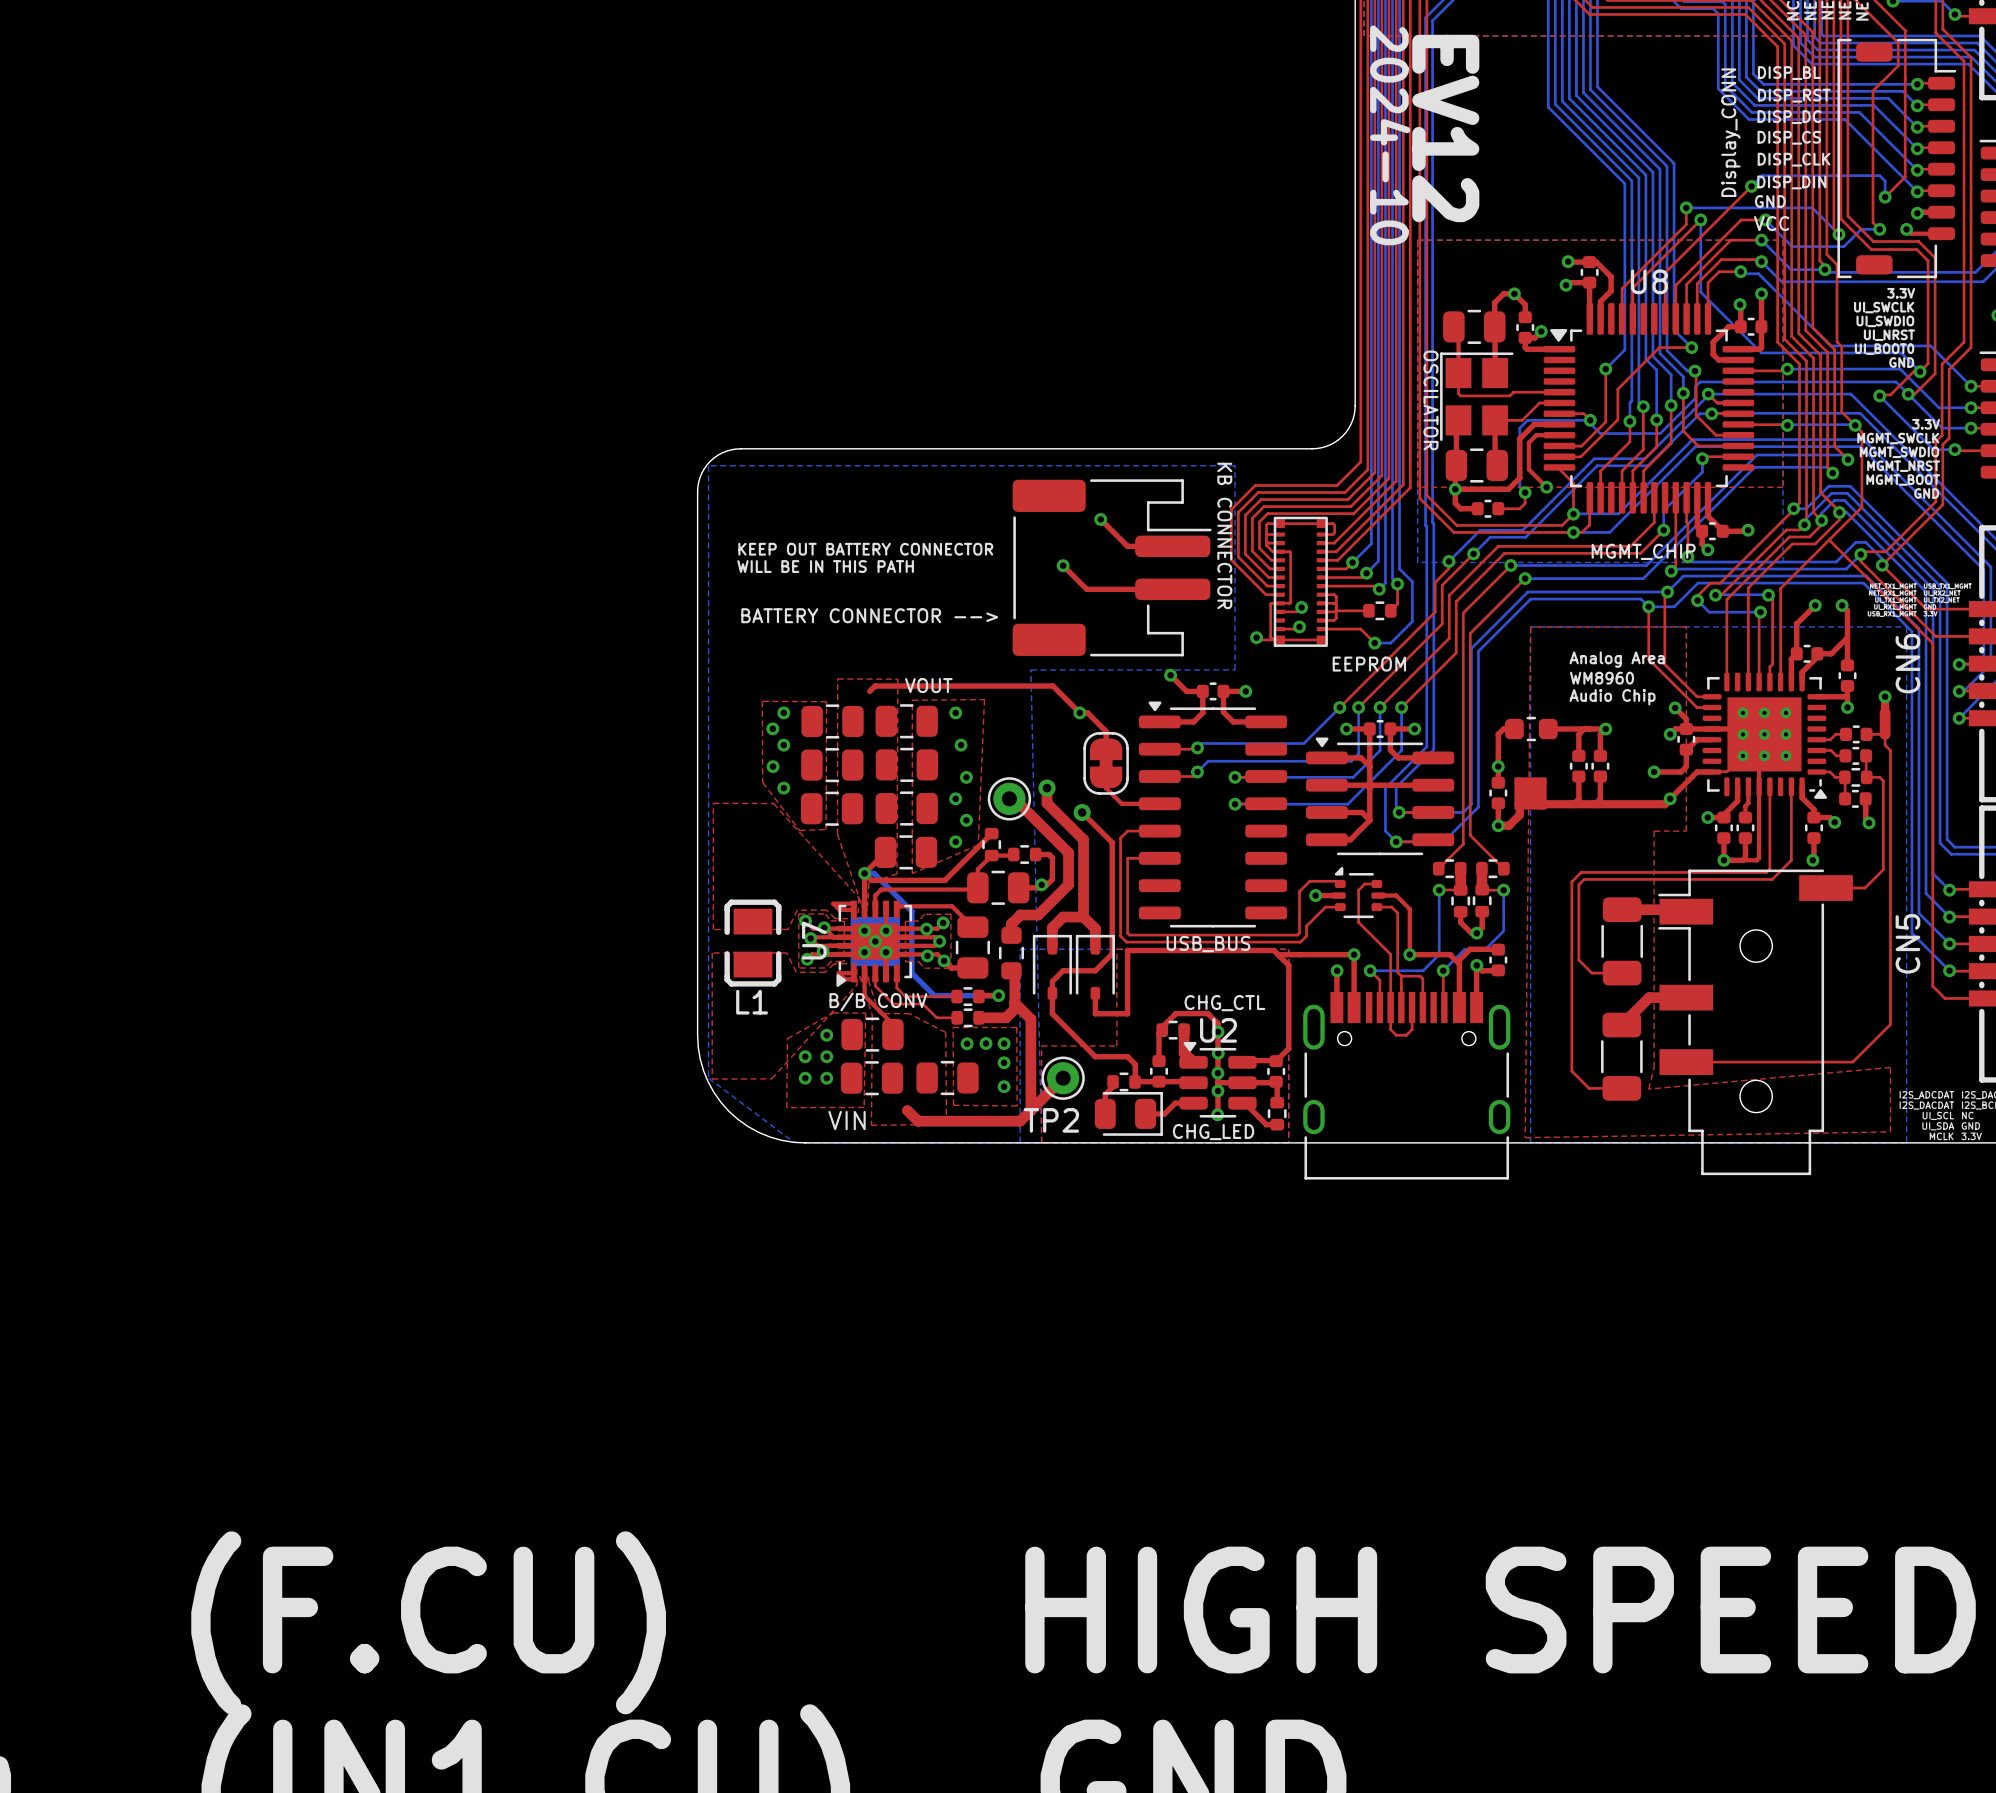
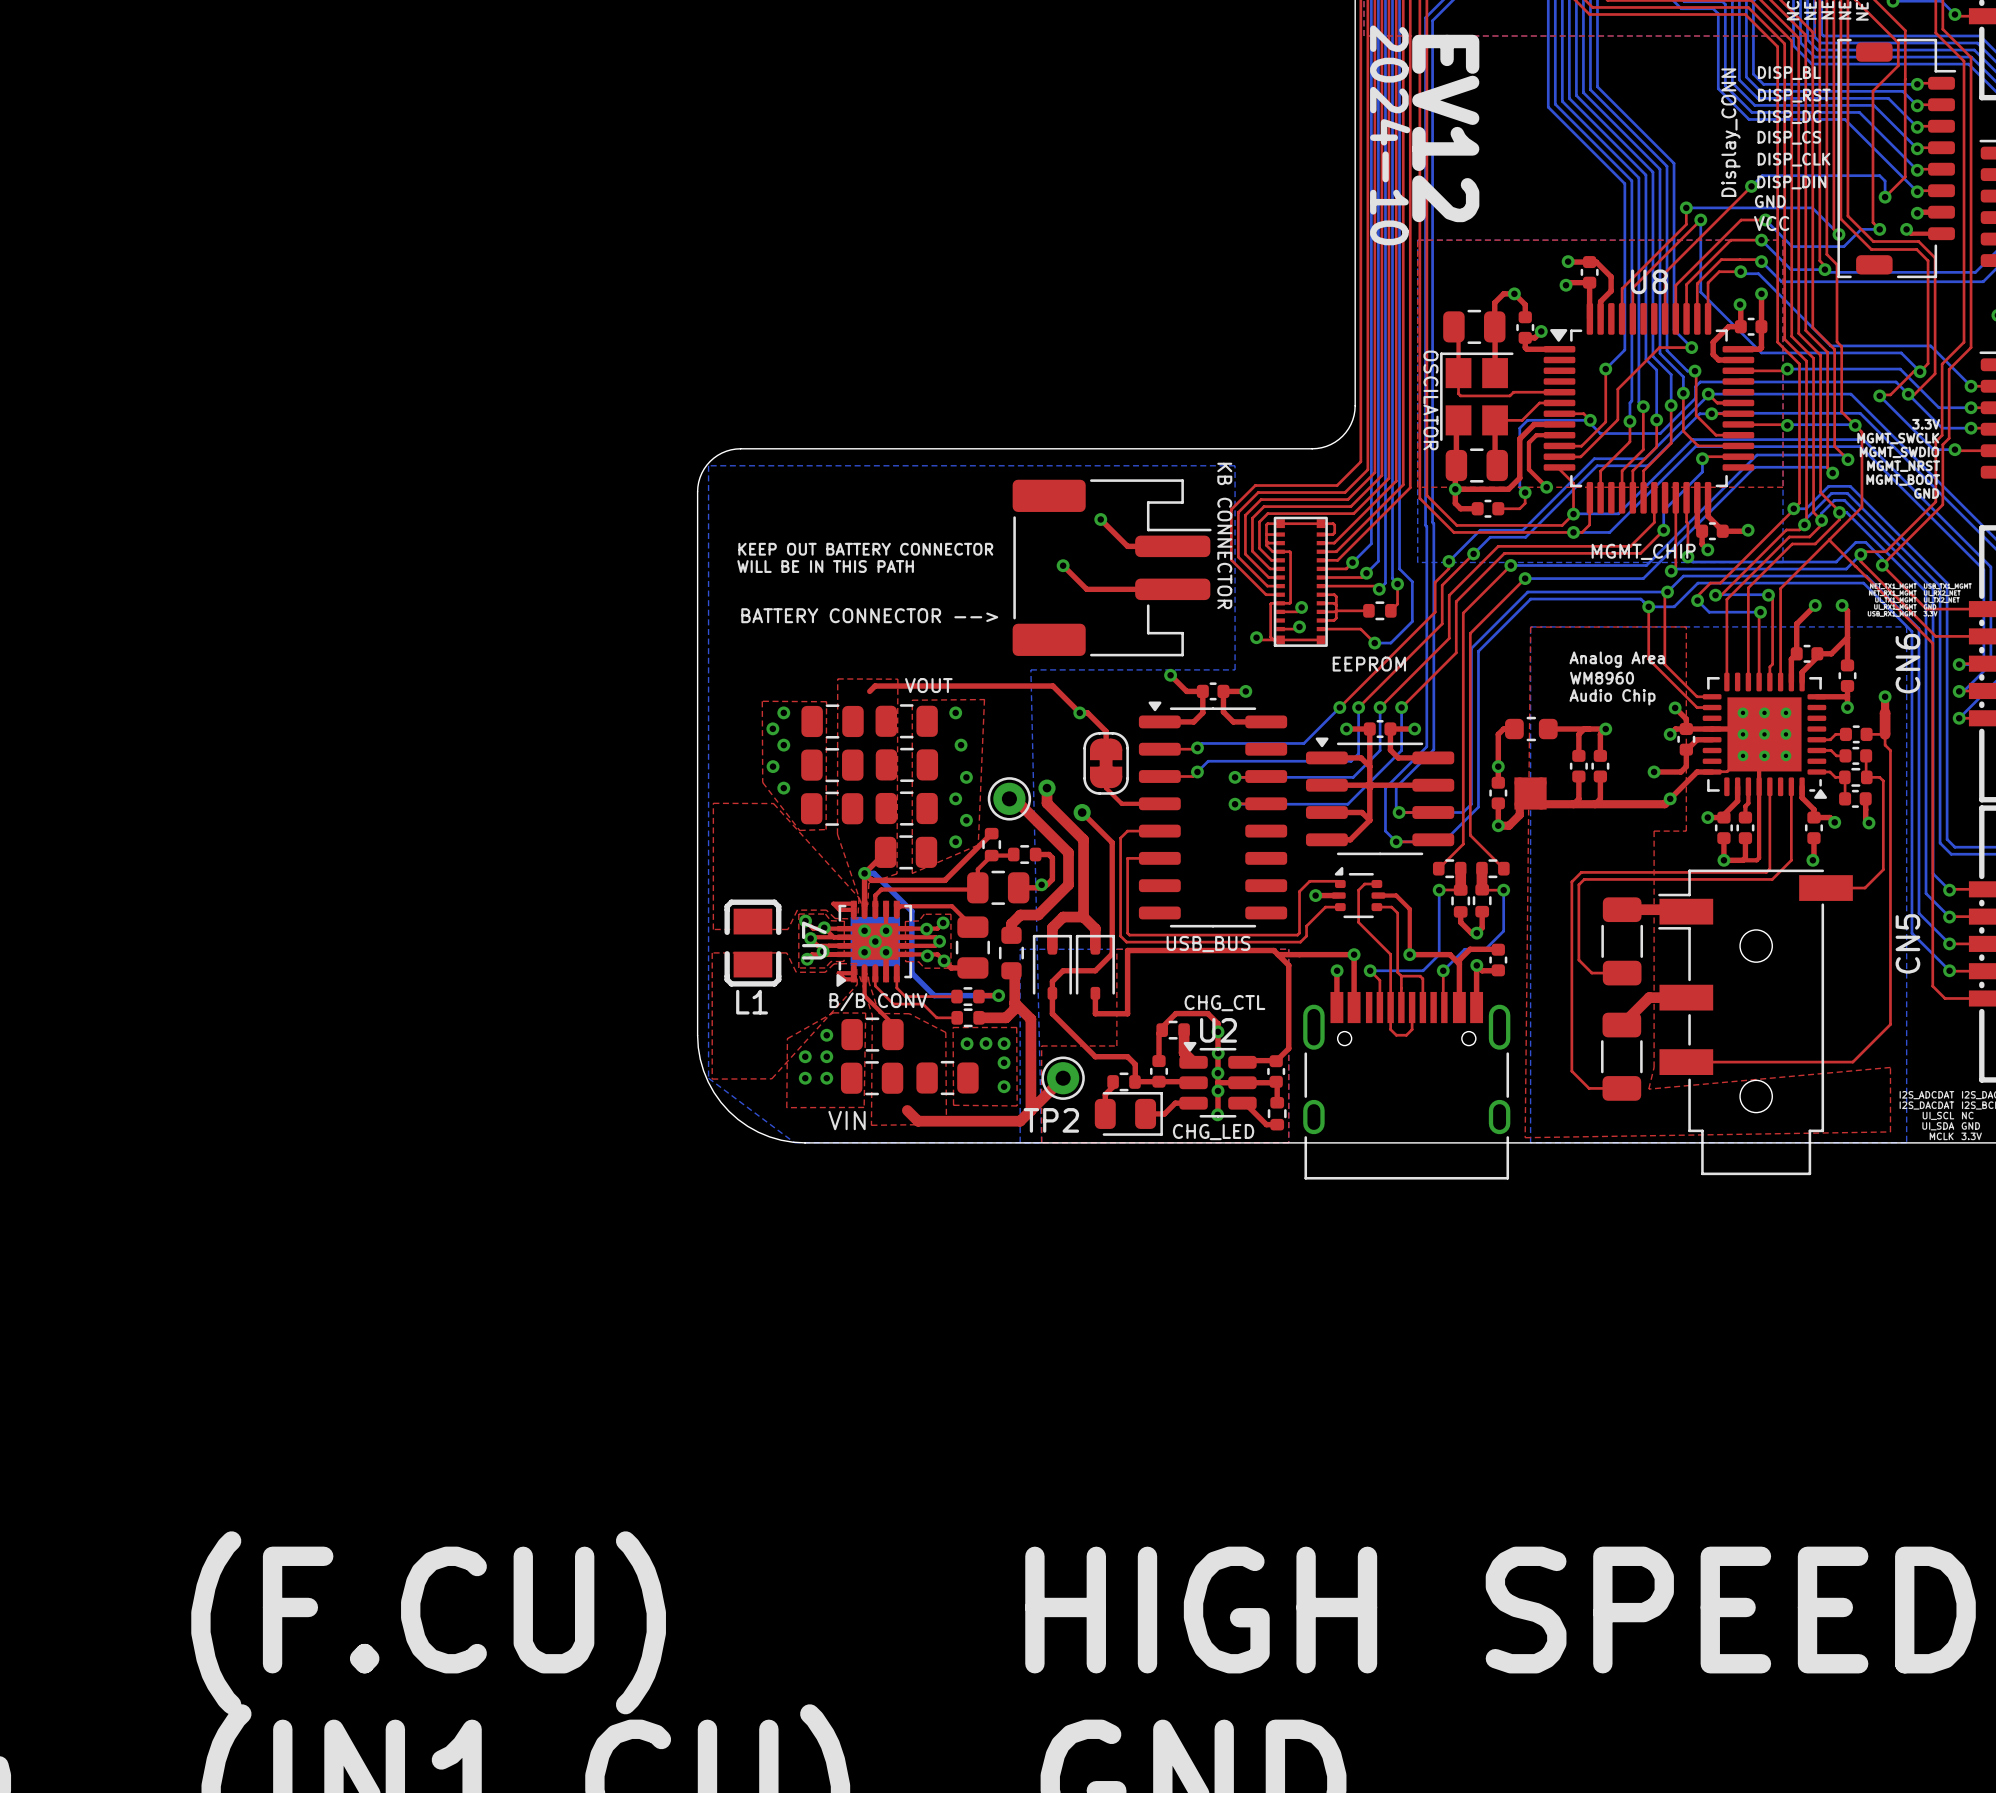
text: 3.3V (1901, 293) -> none
text: UI_SWCLK (1884, 307) -> none
text: UI_SWDIO (1885, 321) -> none
text: UI_NRST (1889, 335) -> none
text: UI_BOOT0 (1884, 349) -> none
text: GND (1901, 362) -> none

